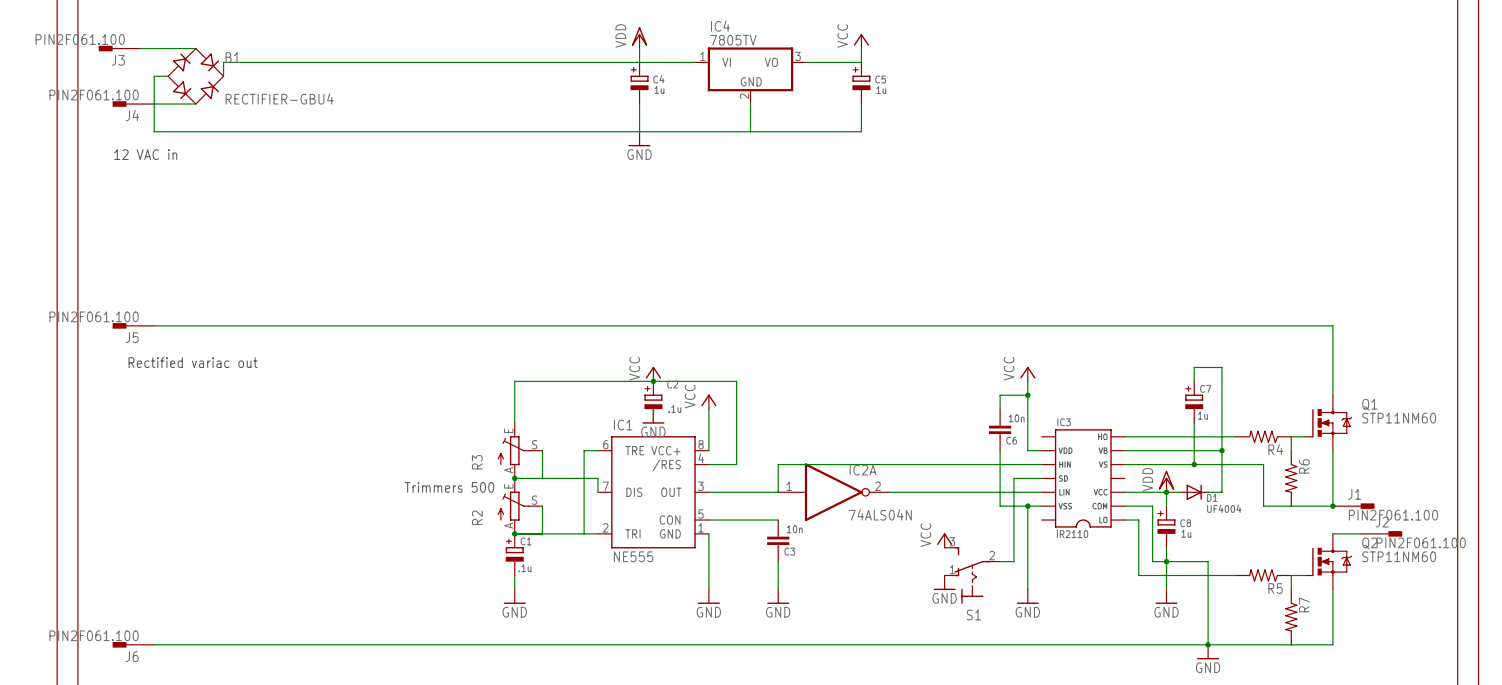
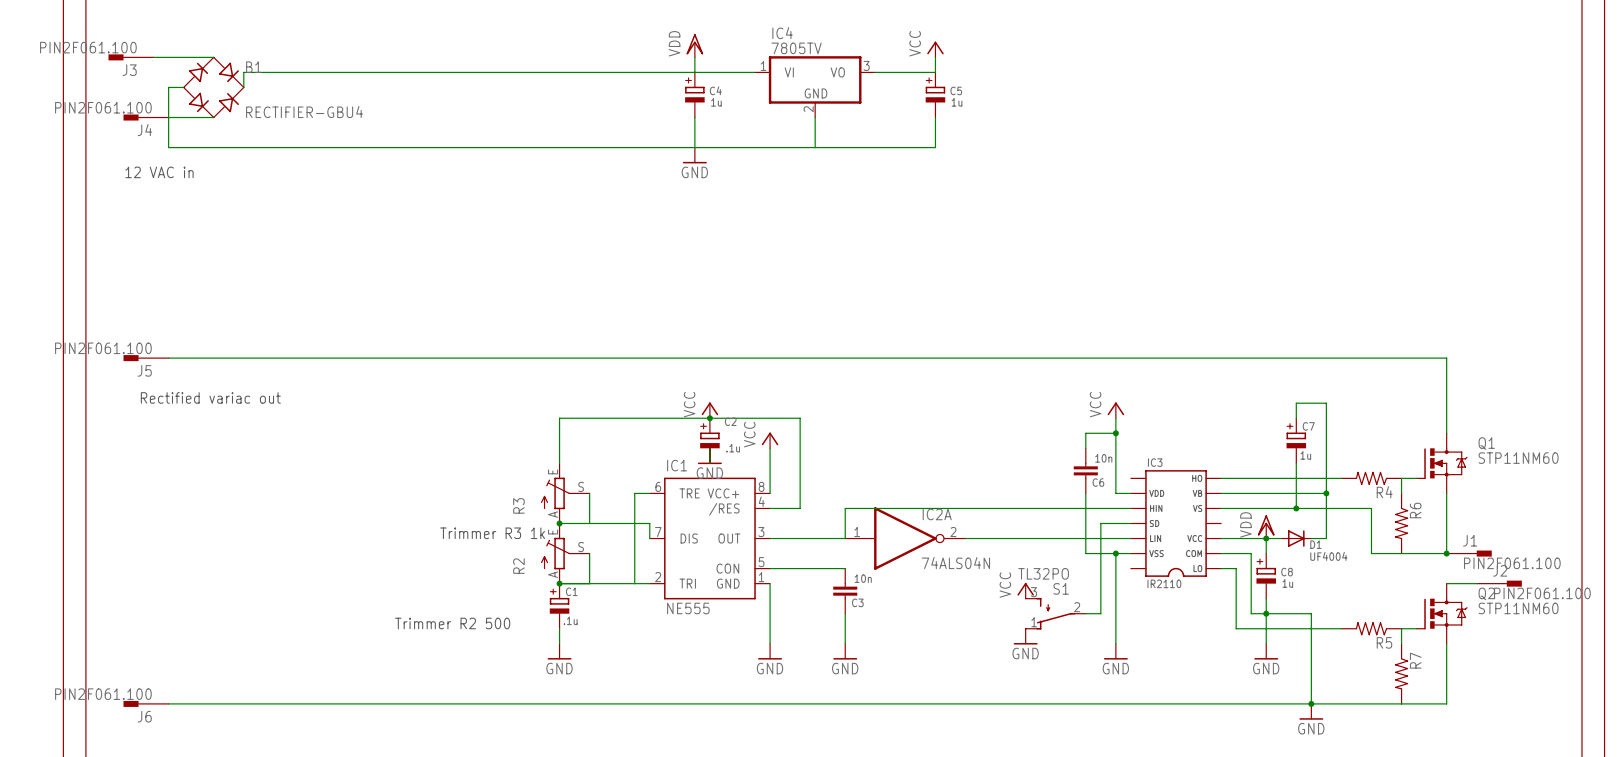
text: Trimmers 500 (449, 487) -> Trimmer R3 1k (492, 533)
S1 value: none -> TL32PO (1043, 573)
S1 symbol: [944, 547, 1001, 604] -> [1025, 597, 1086, 630]
text: none -> Trimmer R2 500 (452, 623)
S1 name position: S1 (973, 615) -> S1 (1061, 588)

